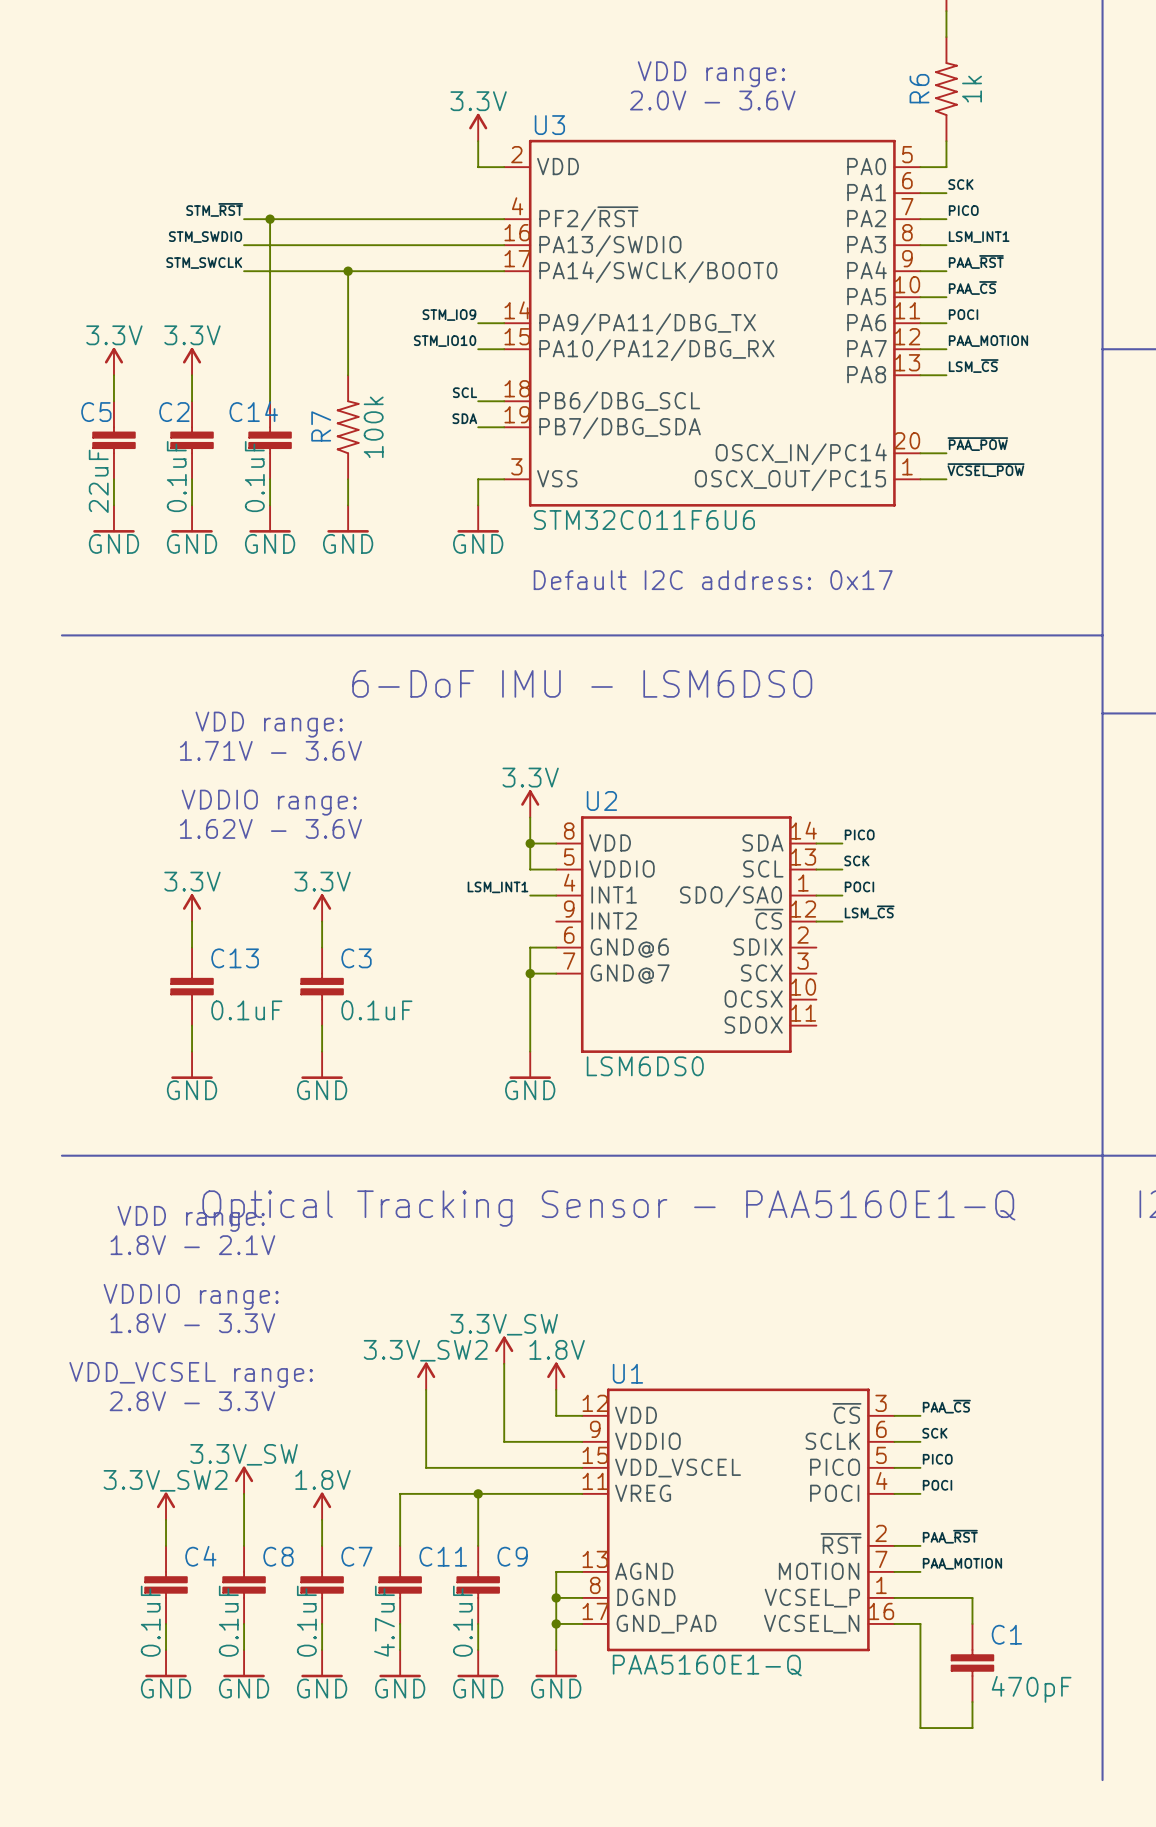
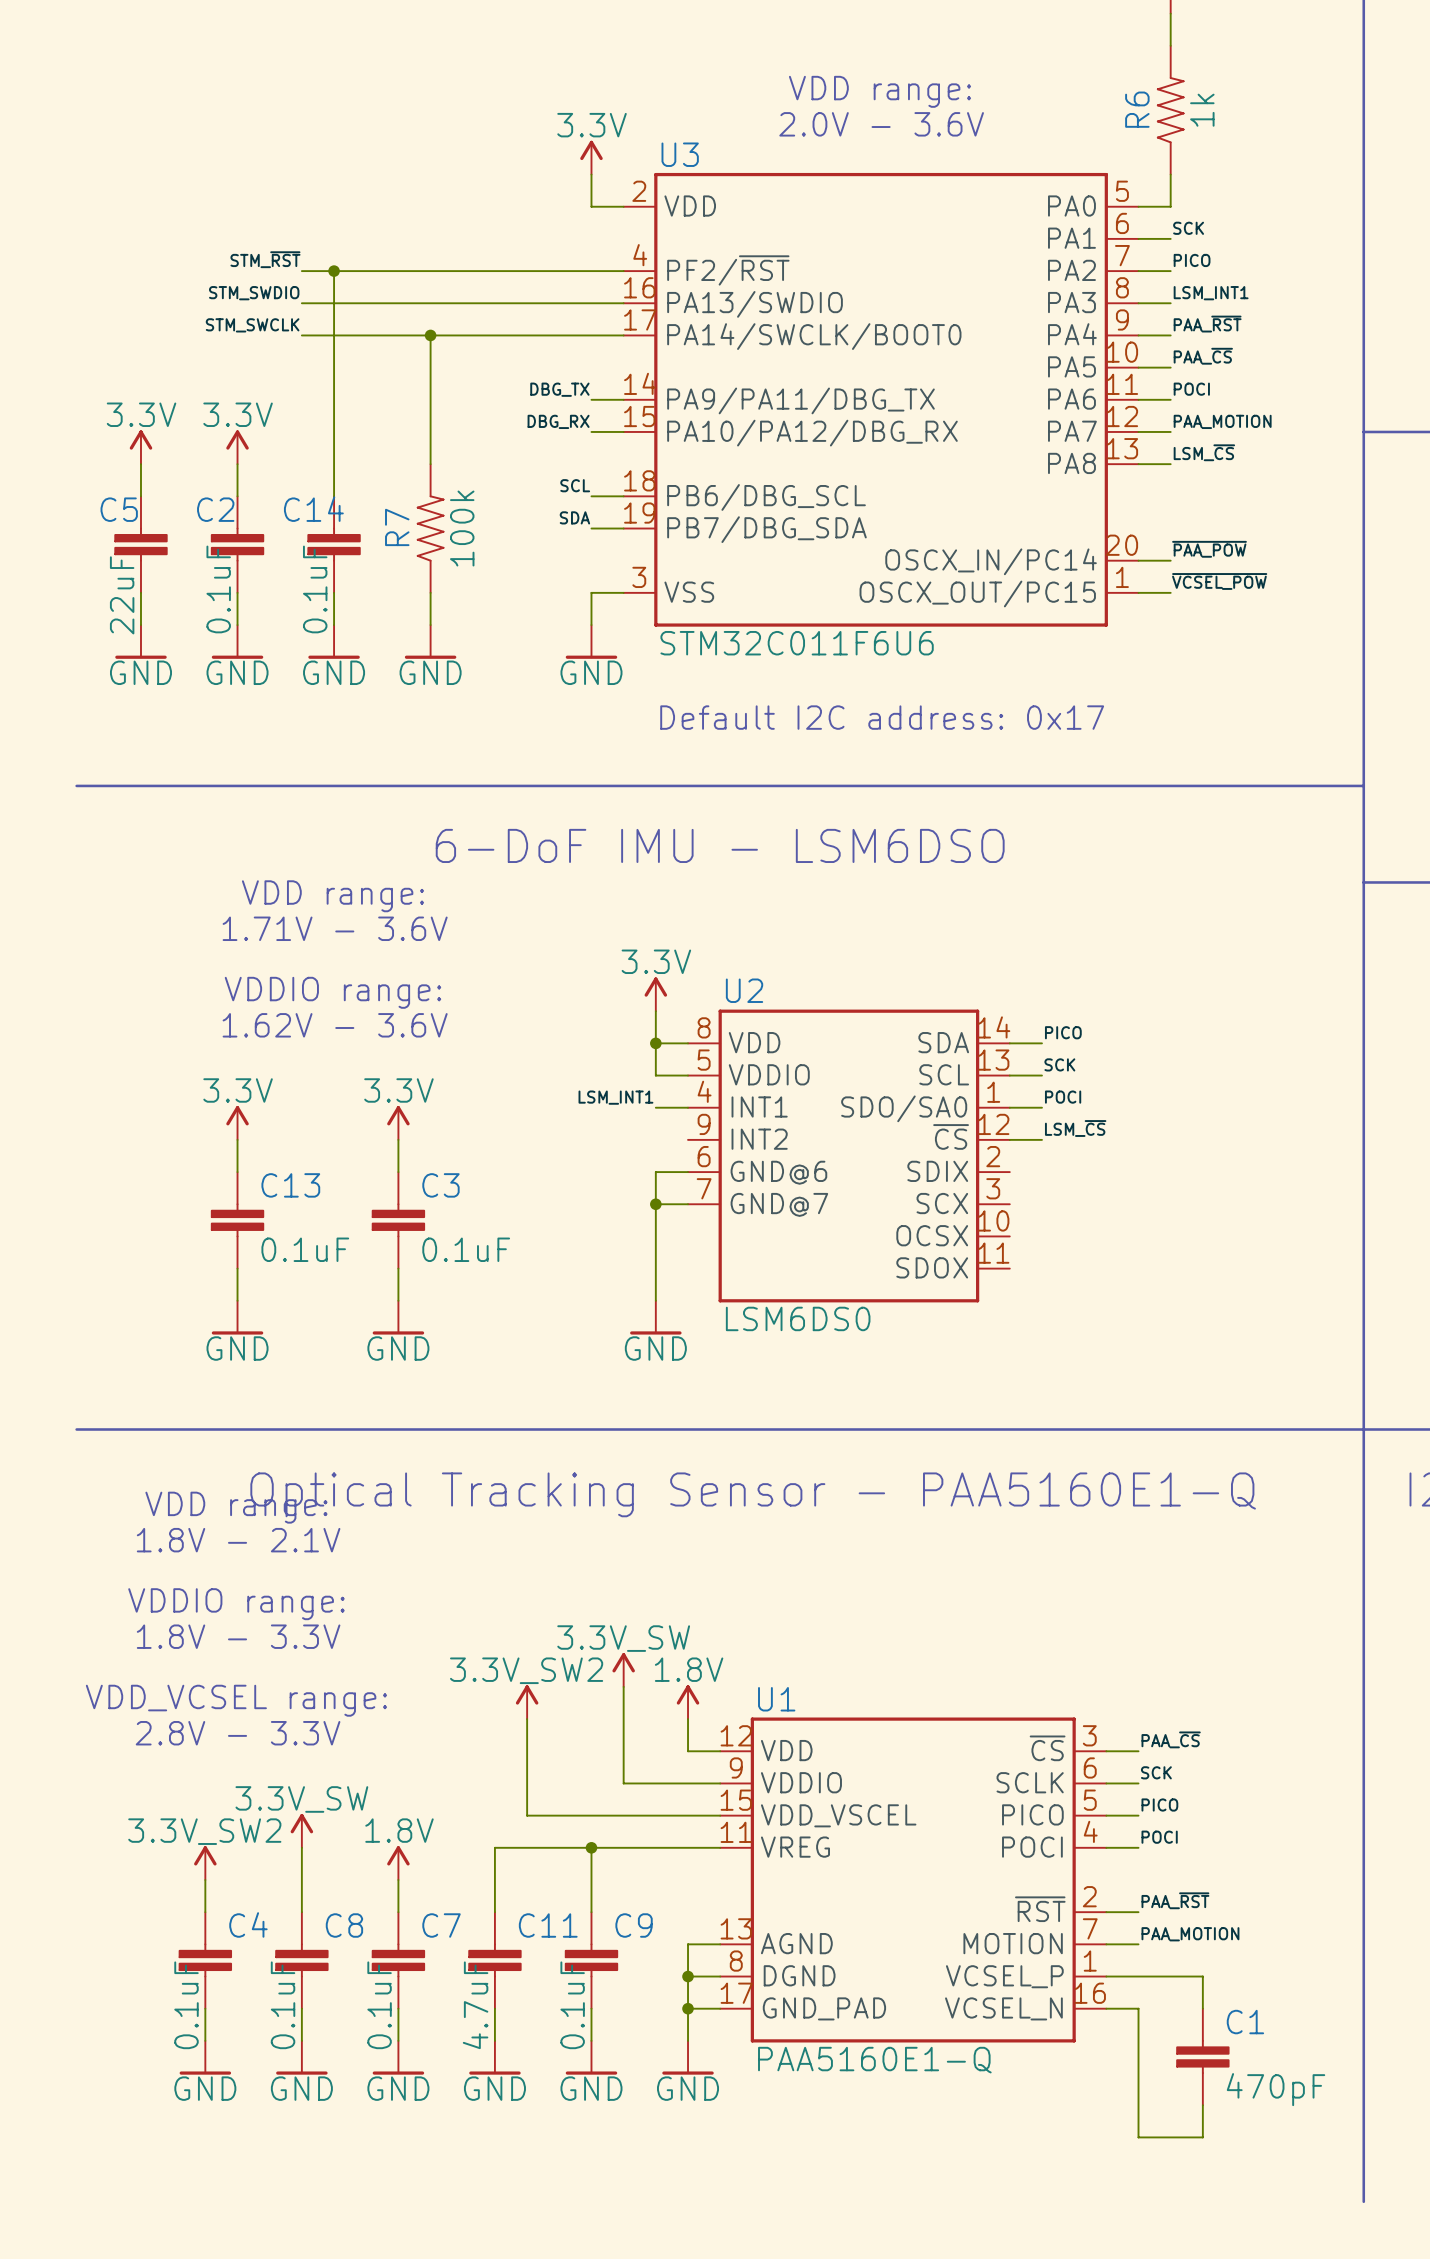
label: STM_IO9 (449, 315) -> DBG_TX (559, 389)
label: STM_IO10 (445, 341) -> DBG_RX (558, 421)

